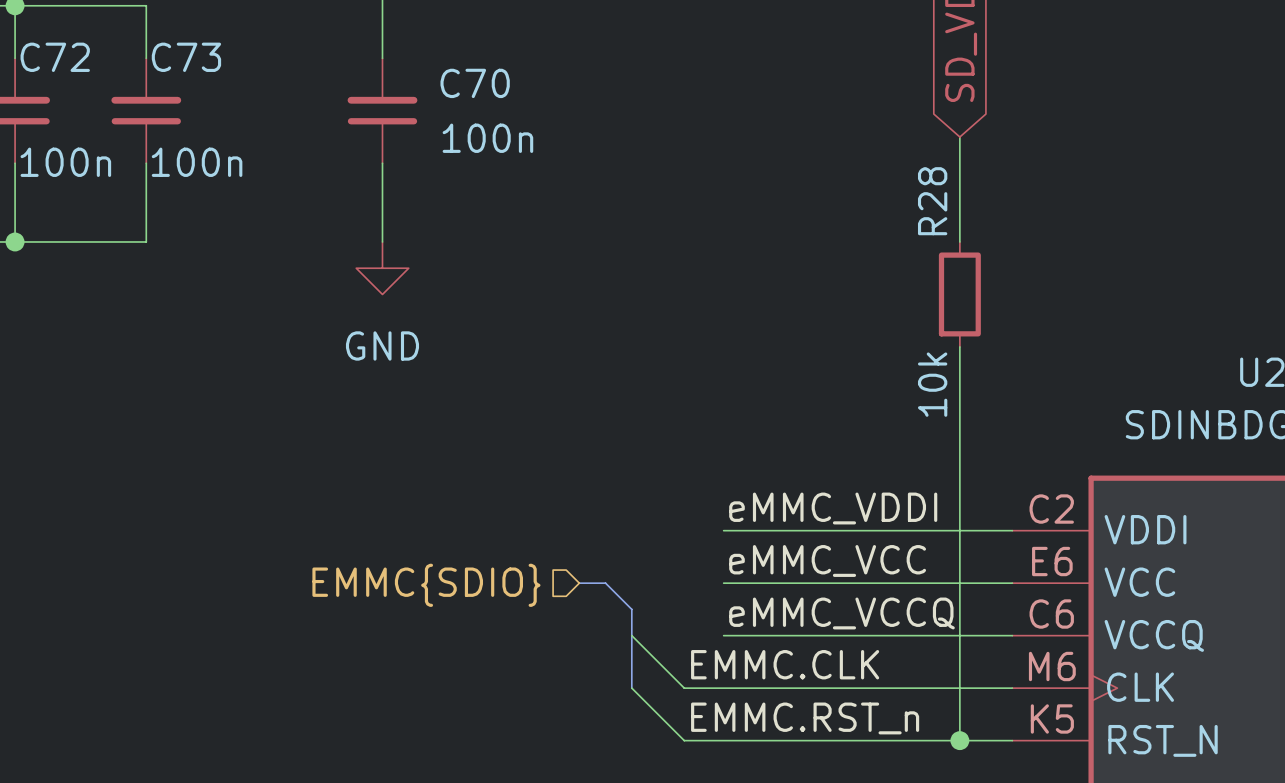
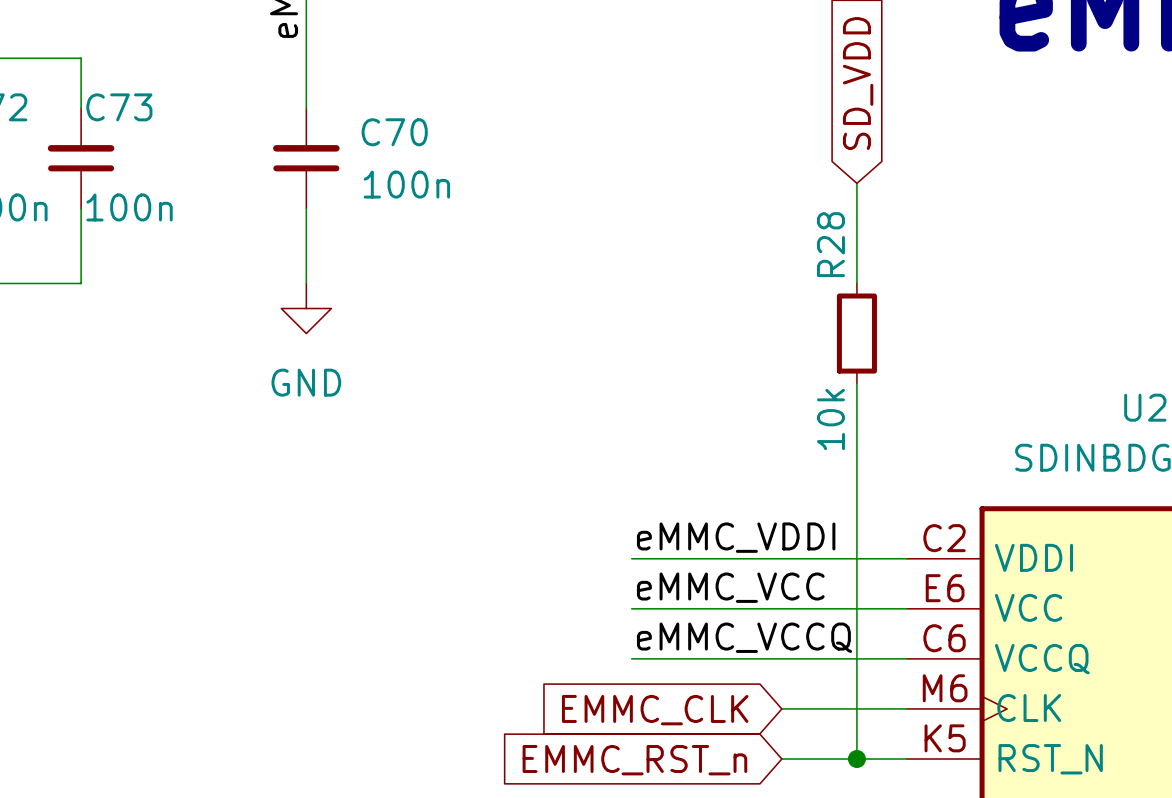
bus: (579, 583) (605, 583) (631, 609) (631, 688) -> none
hierarchical label: EMMC{SDIO} (426, 585) -> none
wire: (631, 635) (684, 688) (881, 688) -> none
label: EMMC.CLK (785, 664) -> none
wire: (631, 688) (684, 740) (881, 740) -> none
global label: none -> EMMC_CLK (655, 710)
label: EMMC.RST_n (805, 718) -> none
global label: none -> EMMC_RST_n (634, 760)

